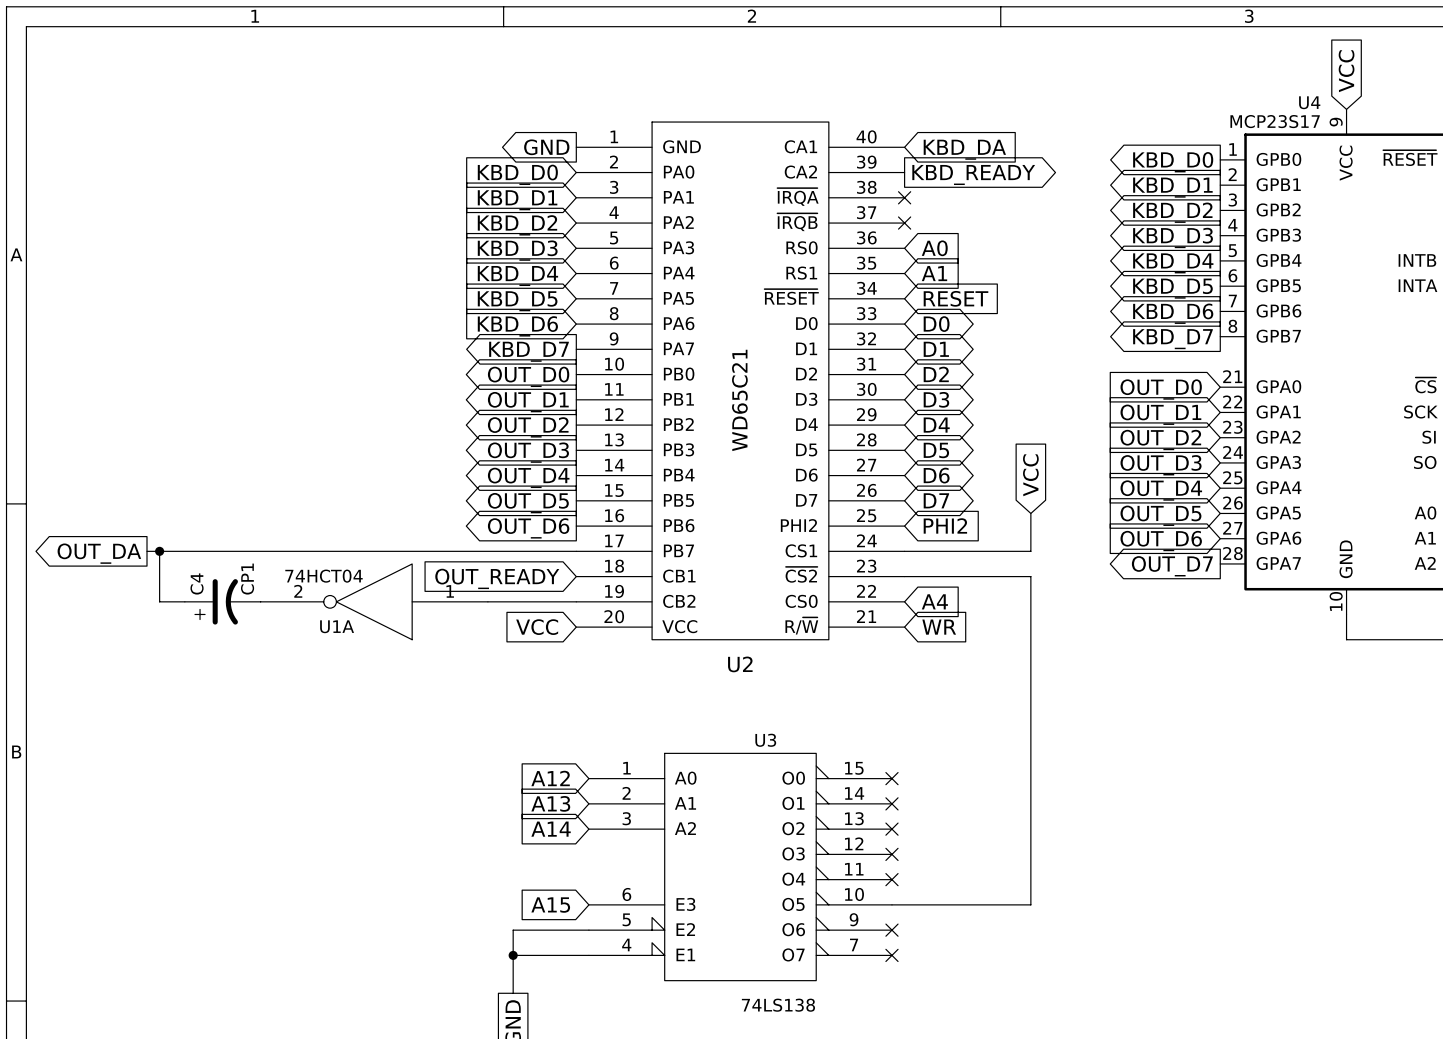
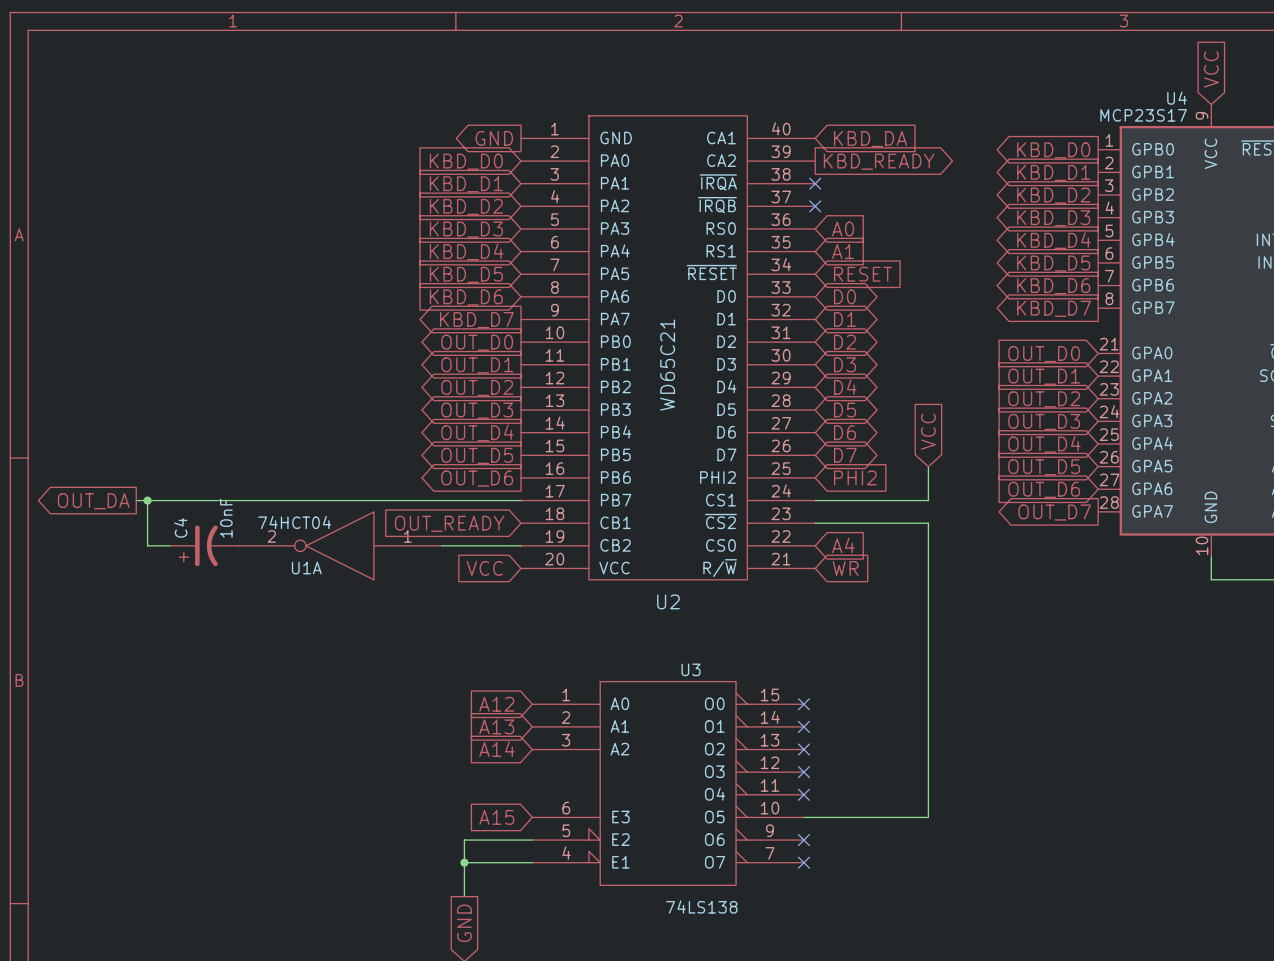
C4 value: CP1 (247, 579) -> 10nF (226, 518)

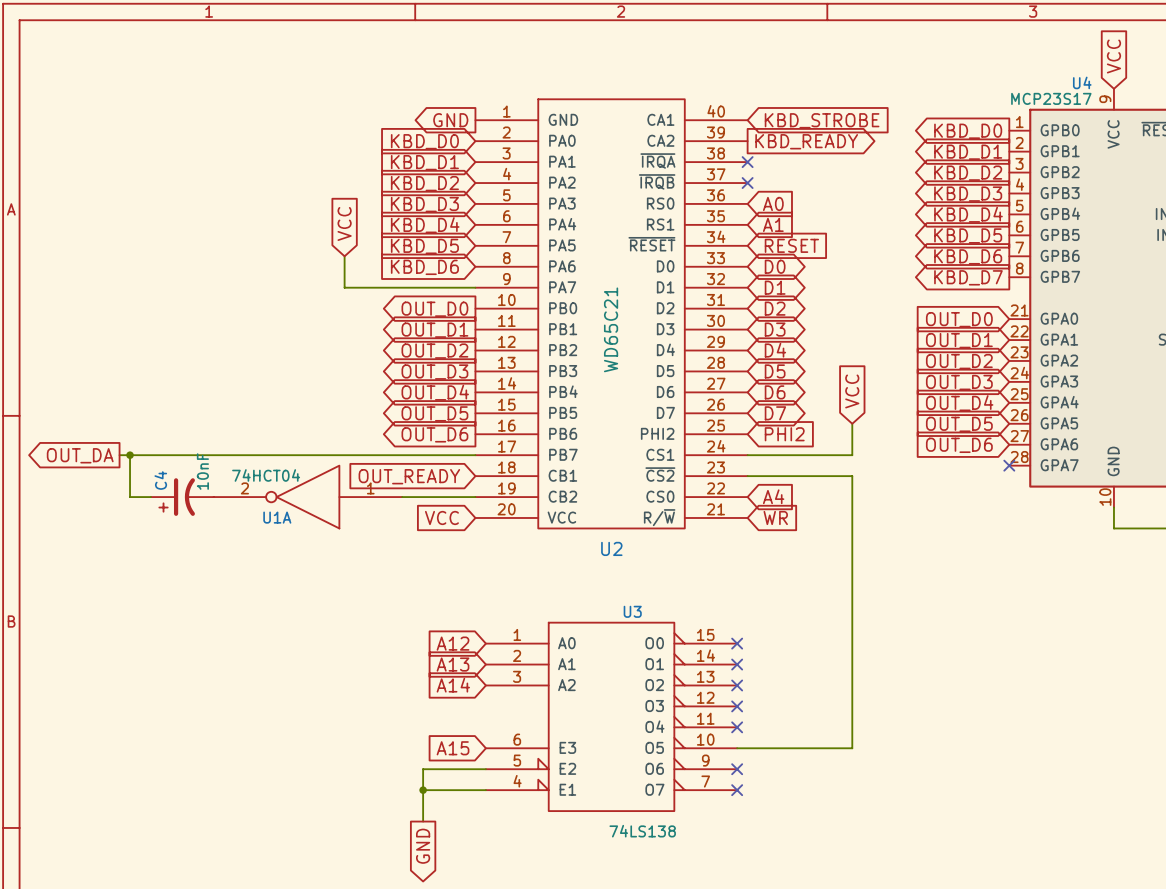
global label: KBD_DA (870, 139) -> KBD_STROBE (822, 120)
global label: none -> VCC (344, 223)
wire: none -> (344, 256) (344, 287) (475, 287)
global label: KBD_D7 (476, 320) -> none
no-connect mark: none -> (1009, 465)
global label: OUT_D7 (1054, 512) -> none

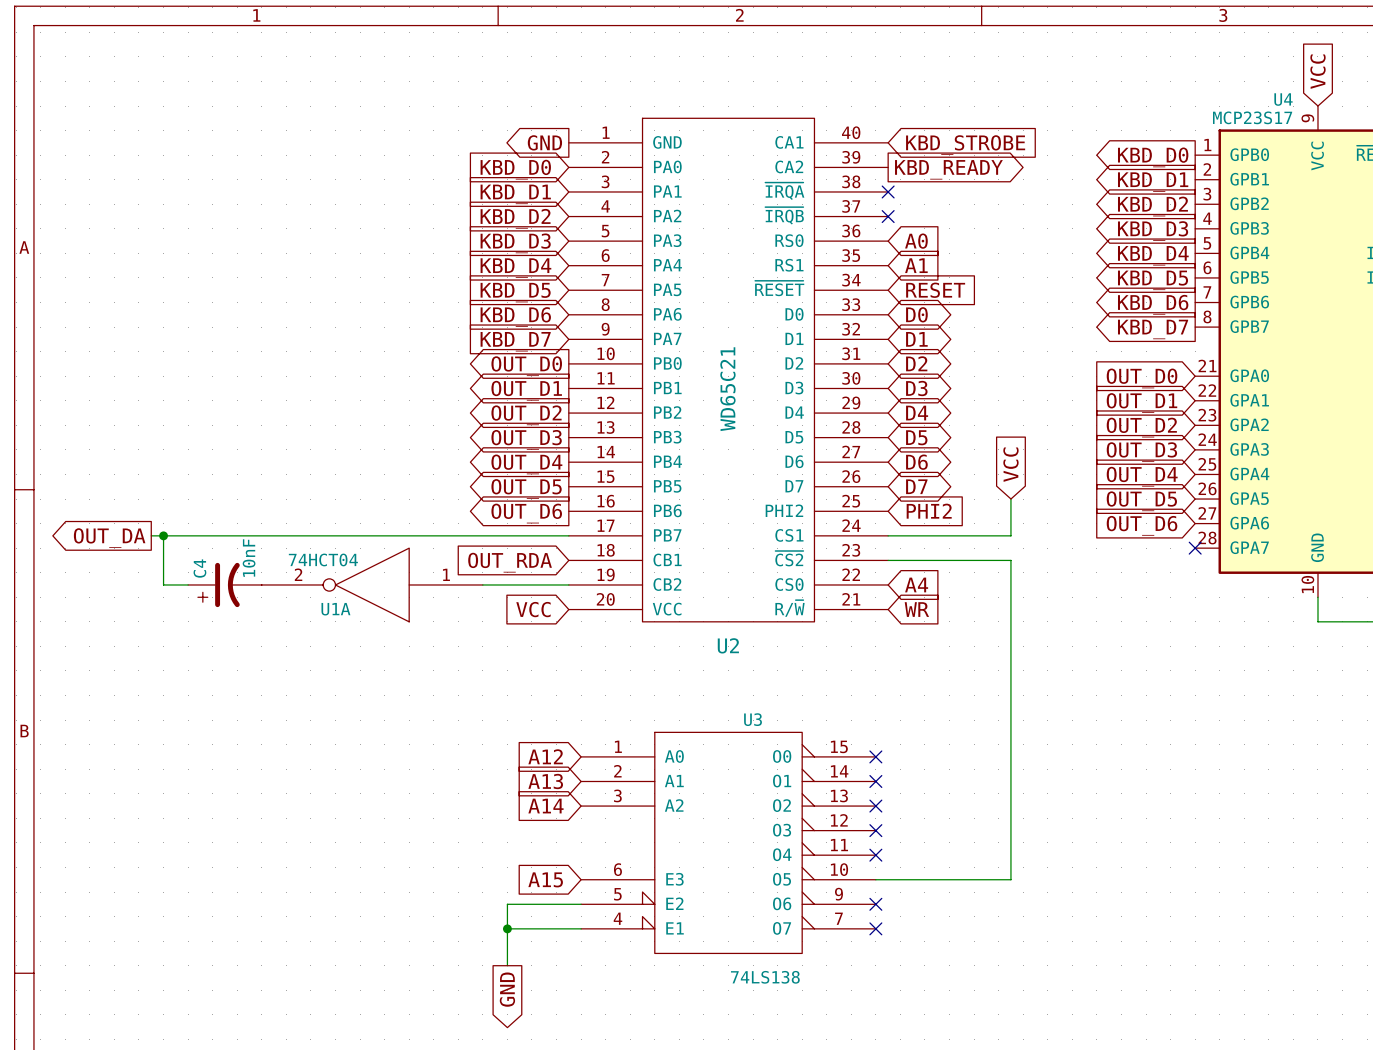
global label: VCC (344, 223) -> none
wire: (344, 256) (344, 287) (475, 287) -> none
global label: none -> KBD_D7 (515, 341)
global label: OUT_READY (409, 476) -> OUT_RDA (510, 562)

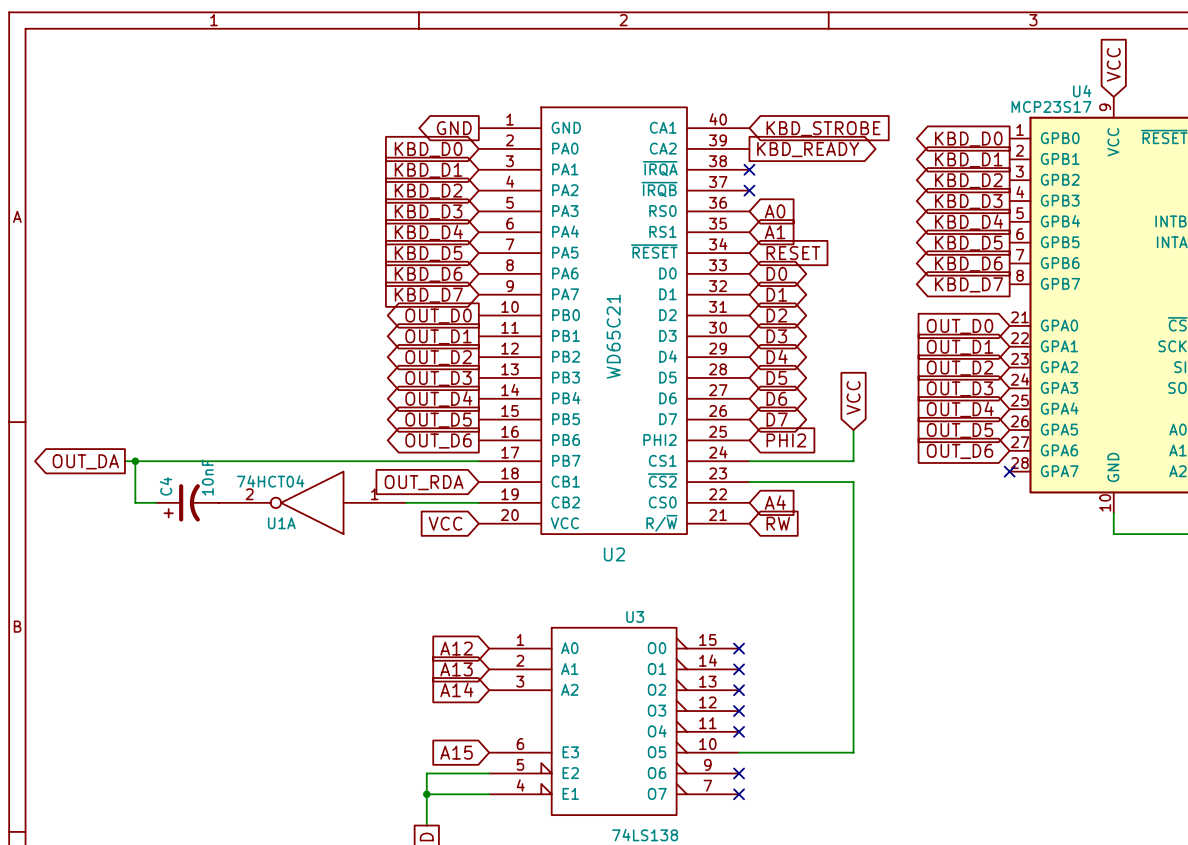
global label: WR (916, 609) -> RW (778, 523)

